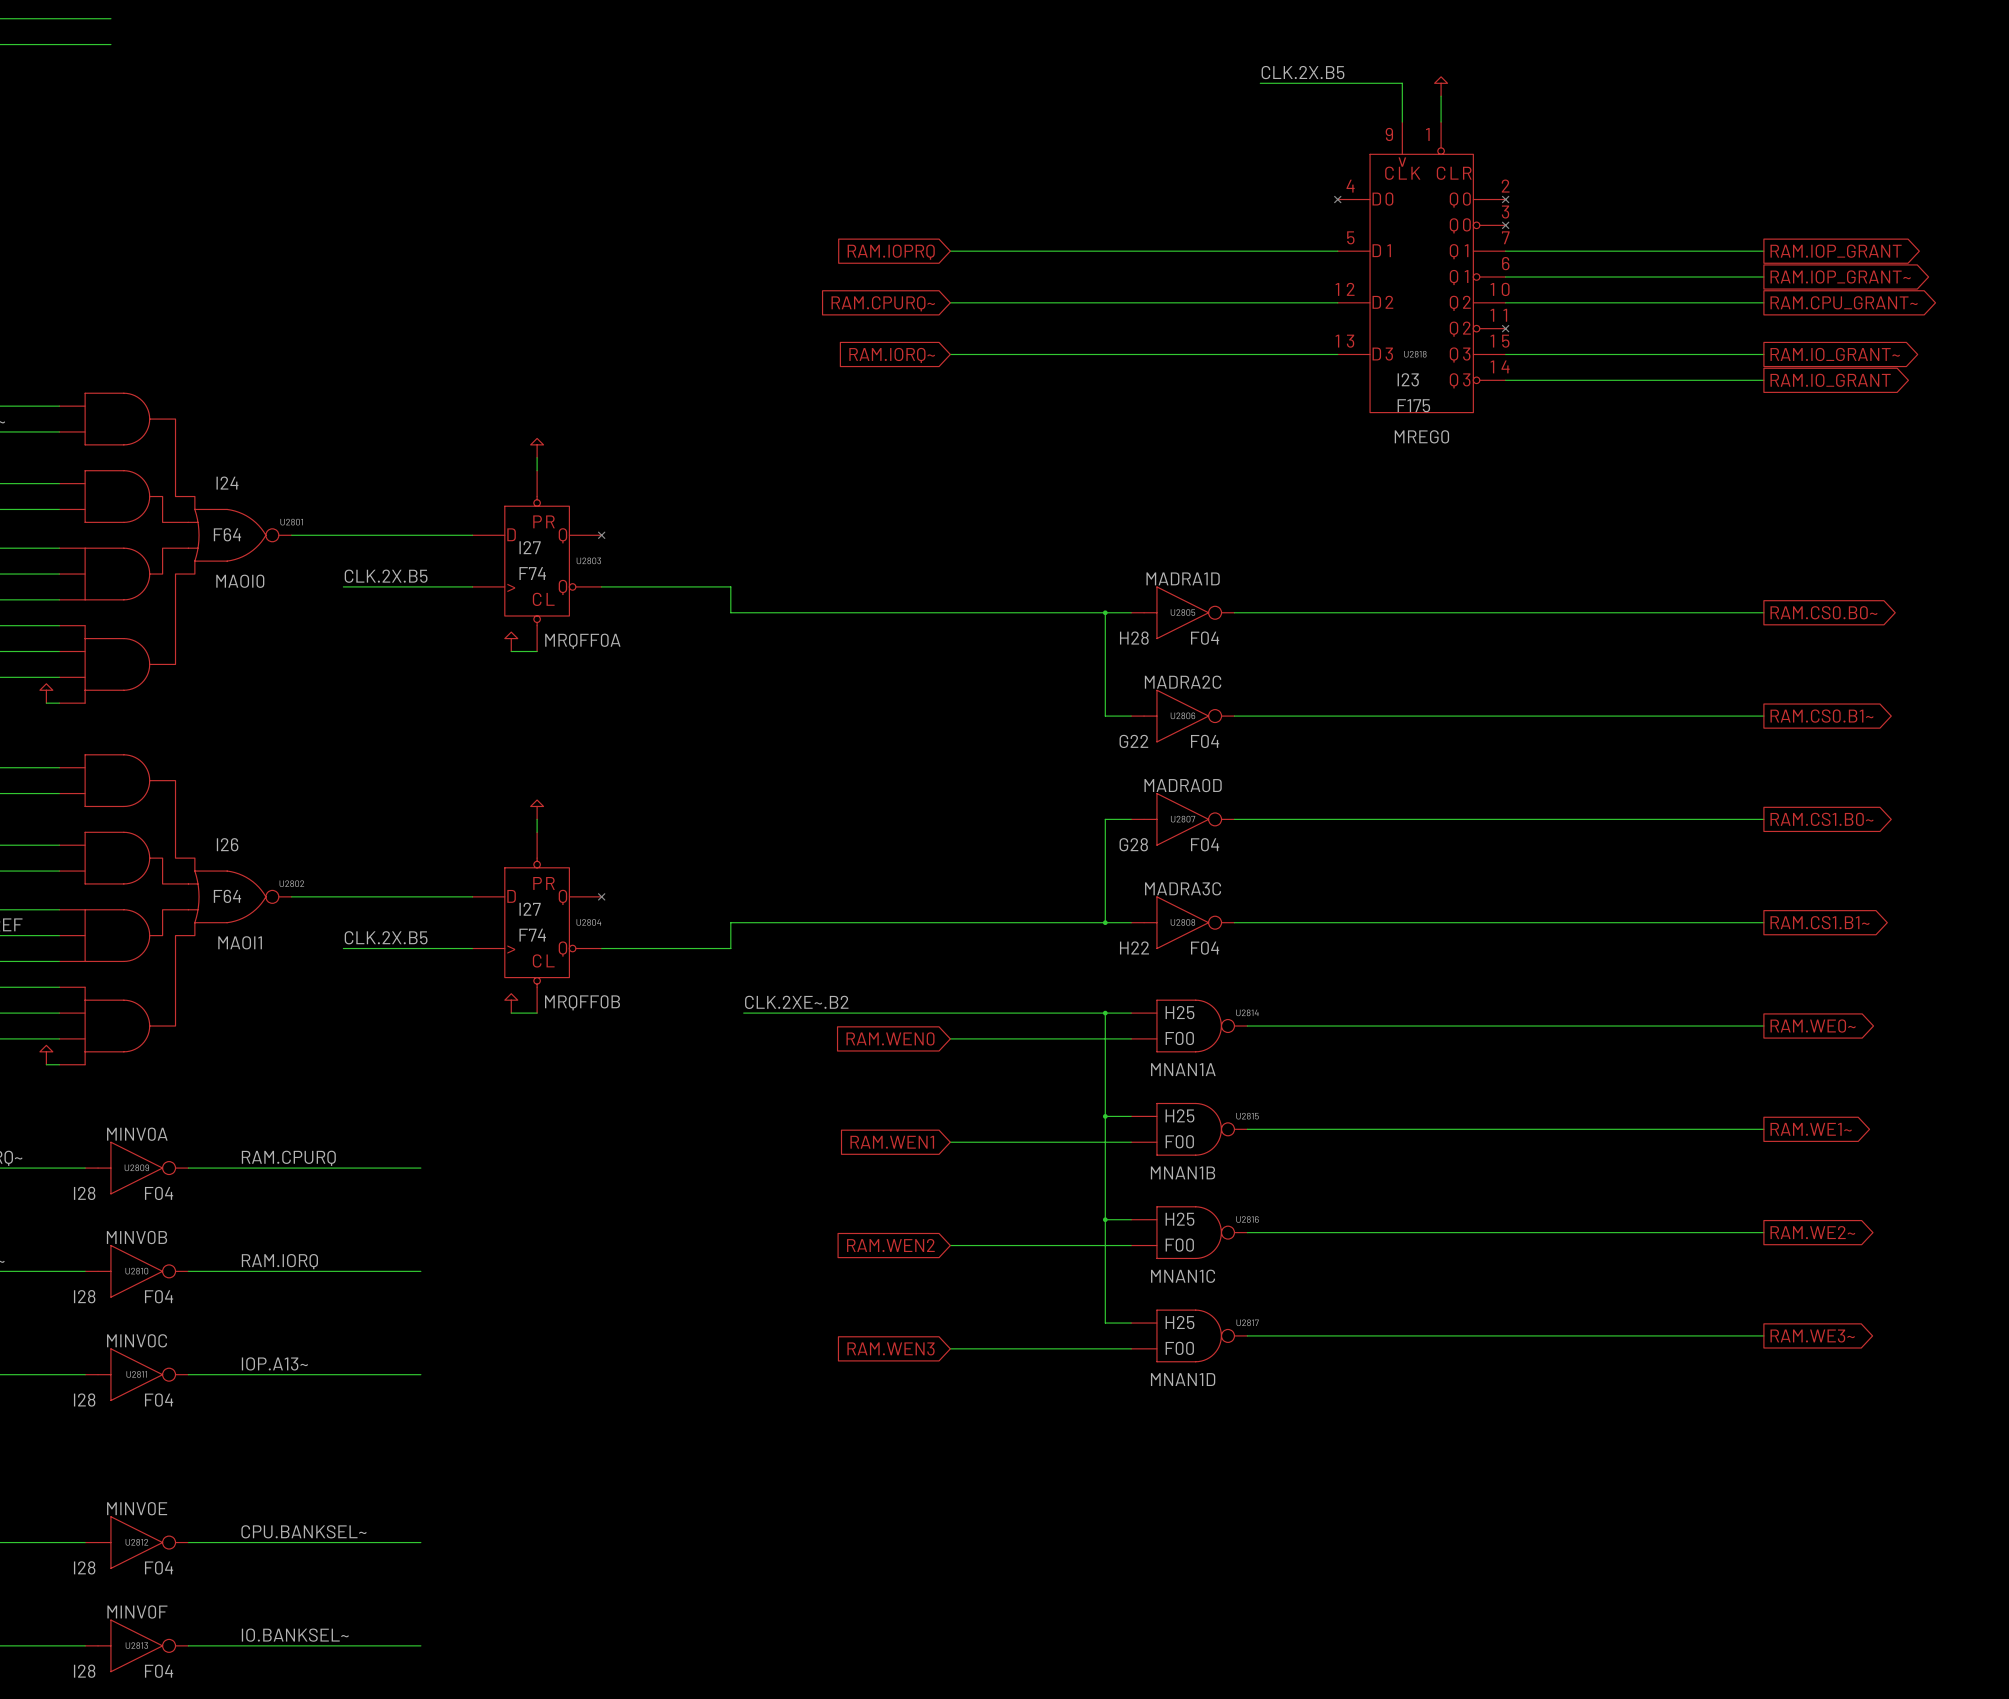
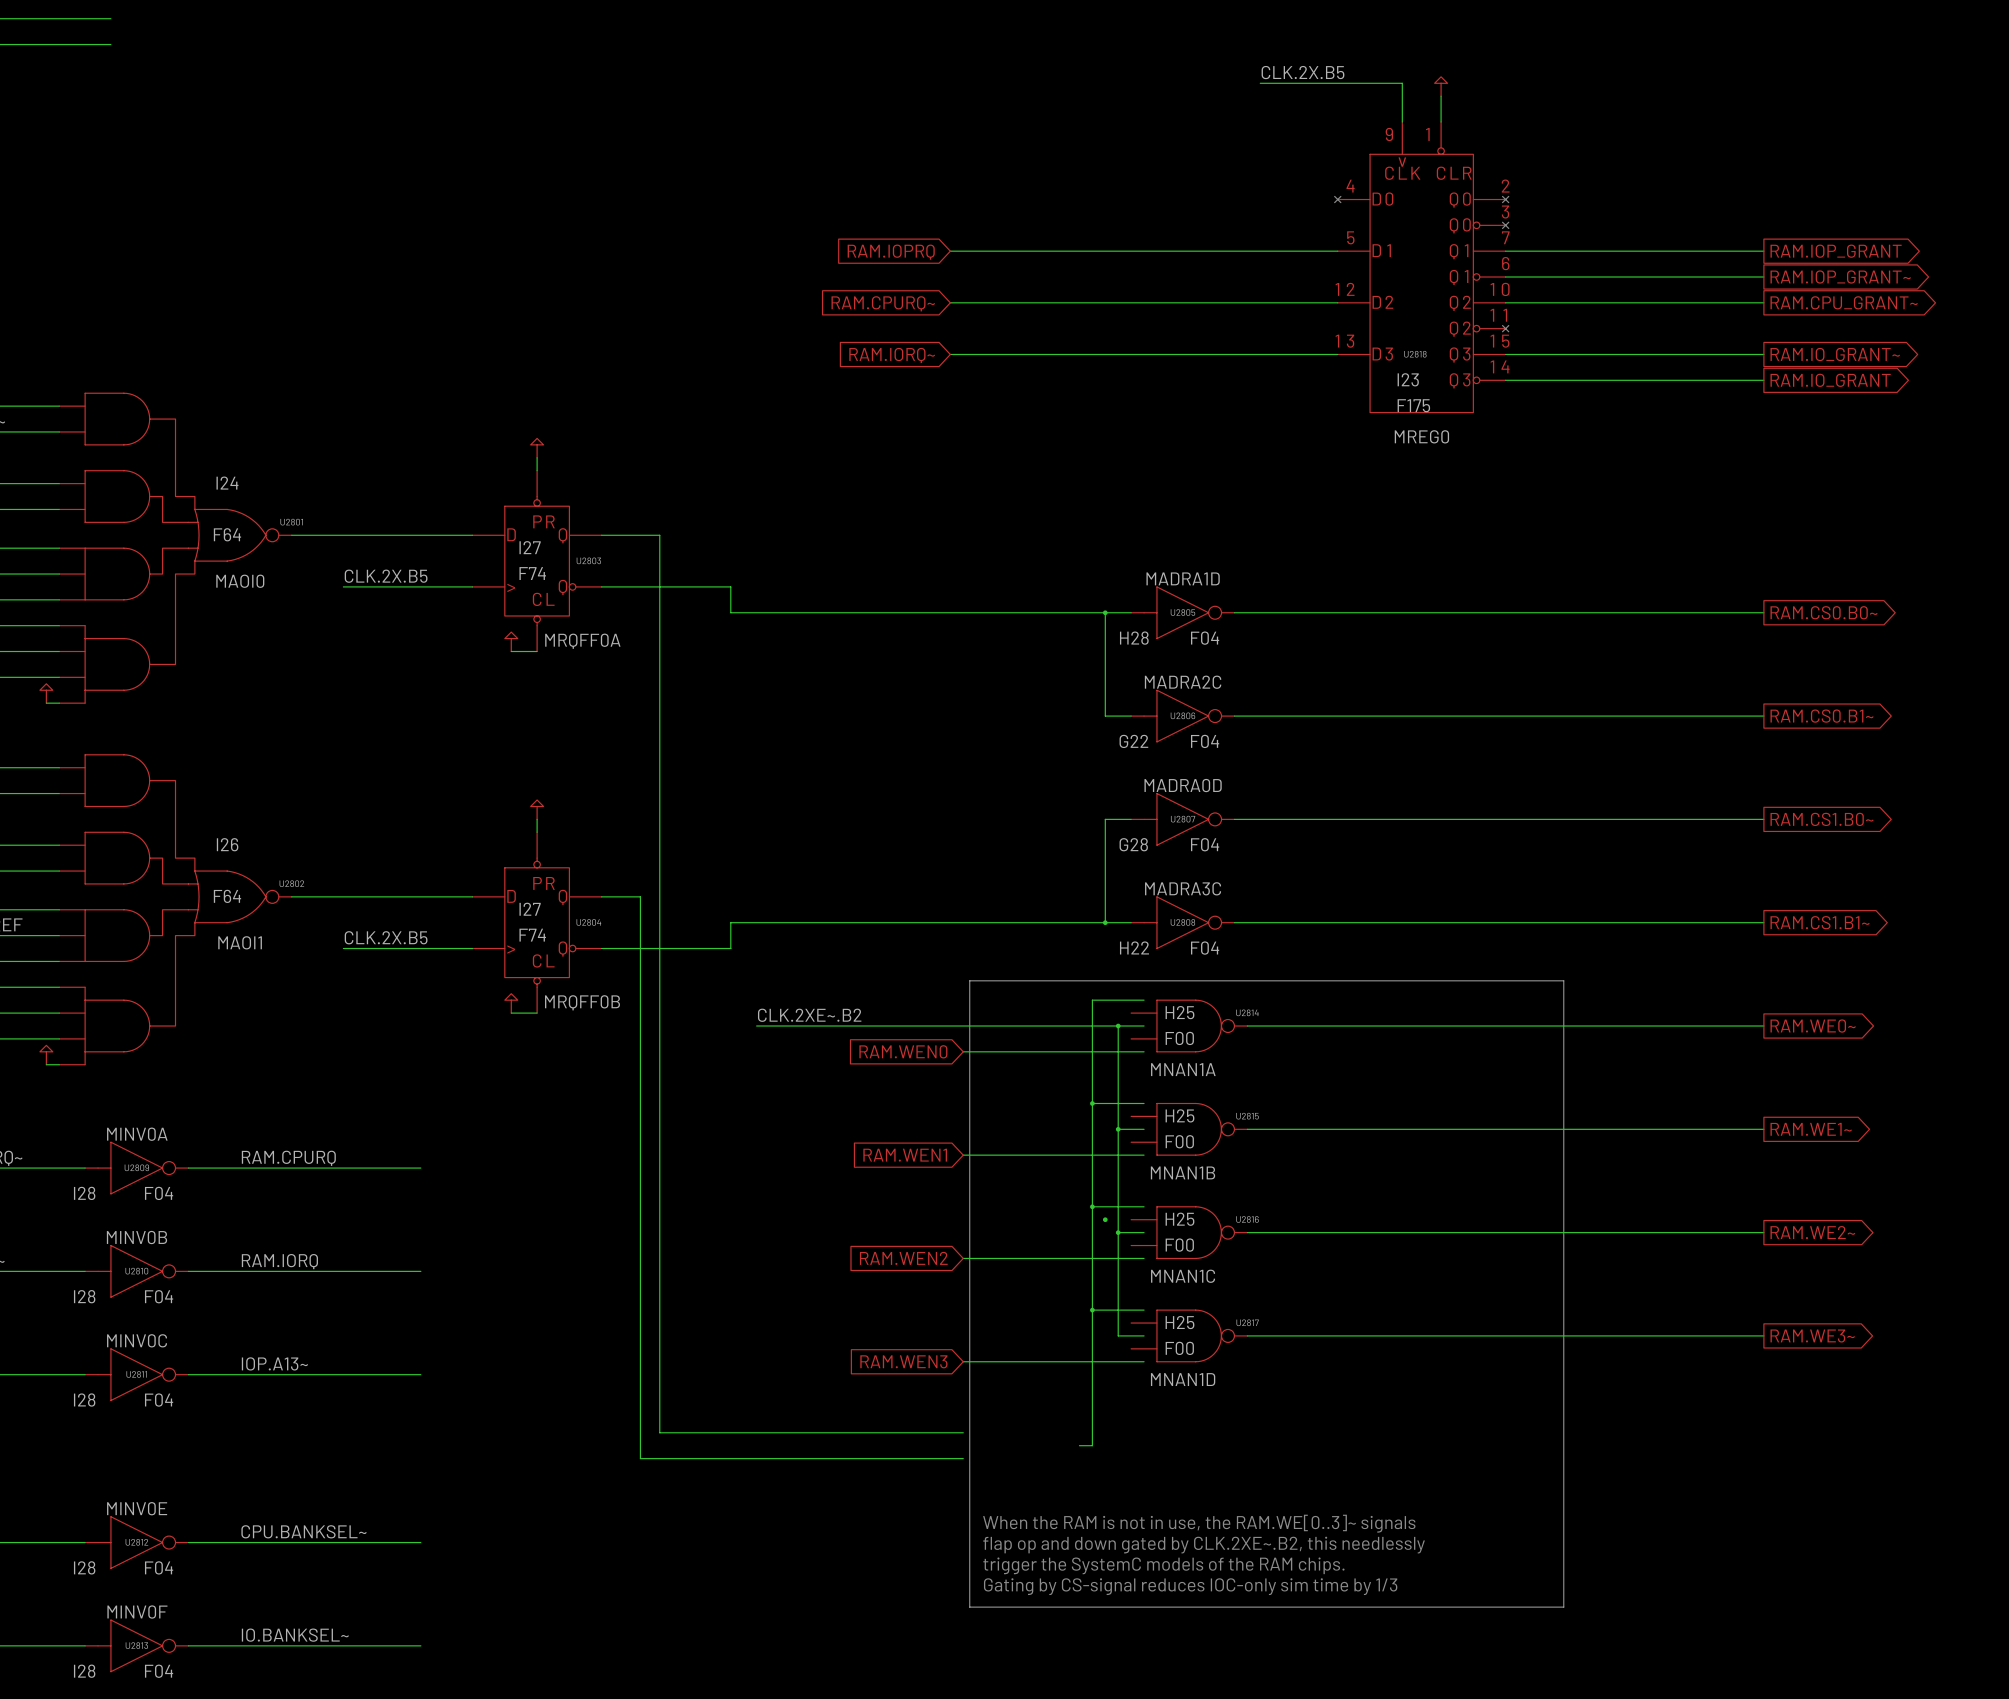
wire: none -> (601, 535) (659, 535) (659, 1432) (963, 1432)
no-connect mark: (601, 535) -> none
wire: none -> (601, 896) (640, 896) (640, 1458) (963, 1458)
no-connect mark: (601, 896) -> none
line: none -> (969, 980) (969, 1607) (1563, 1607) (1563, 980) (969, 980)
wire: none -> (1144, 1000) (1092, 1000) (1092, 1445) (1079, 1445)
label position: CLK.2XE~.B2 (796, 1002) -> CLK.2XE~.B2 (809, 1015)
wire: (743, 1013) (1131, 1013) -> (756, 1026) (1144, 1026)
wire: (1105, 1013) (1105, 1323) (1131, 1323) -> (1118, 1026) (1118, 1335) (1144, 1335)
junction position: (1105, 1013) -> (1118, 1026)
global label position: RAM.WEN0 (890, 1038) -> RAM.WEN0 (903, 1051)
wire: (950, 1038) (1131, 1038) -> (963, 1051) (1144, 1051)
wire: none -> (1092, 1103) (1144, 1103)
junction: none -> (1092, 1103)
wire: (1105, 1116) (1131, 1116) -> (1118, 1129) (1144, 1129)
junction: (1105, 1116) -> none
junction: none -> (1118, 1129)
global label position: RAM.WEN1 (892, 1142) -> RAM.WEN1 (905, 1155)
wire: (950, 1142) (1131, 1142) -> (963, 1155) (1144, 1155)
wire: none -> (1092, 1206) (1144, 1206)
junction: none -> (1092, 1206)
wire: (1105, 1219) (1131, 1219) -> (1118, 1232) (1144, 1232)
junction: none -> (1118, 1232)
global label position: RAM.WEN2 (890, 1245) -> RAM.WEN2 (903, 1258)
wire: (950, 1245) (1131, 1245) -> (963, 1258) (1144, 1258)
wire: none -> (1092, 1310) (1144, 1310)
junction: none -> (1092, 1310)
global label position: RAM.WEN3 (891, 1348) -> RAM.WEN3 (903, 1361)
wire: (950, 1348) (1131, 1348) -> (963, 1361) (1144, 1361)
text: none -> When the RAM is not in use, the RAM.WE[0..3]~ signals (1199, 1523)
text: none -> flap op and down gated by CLK.2XE~.B2, this needlessly (1204, 1545)
text: none -> trigger the SystemC models of the RAM chips. (1163, 1565)
text: none -> Gating by CS-signal reduces IOC-only sim time by 1/3 (1190, 1586)

